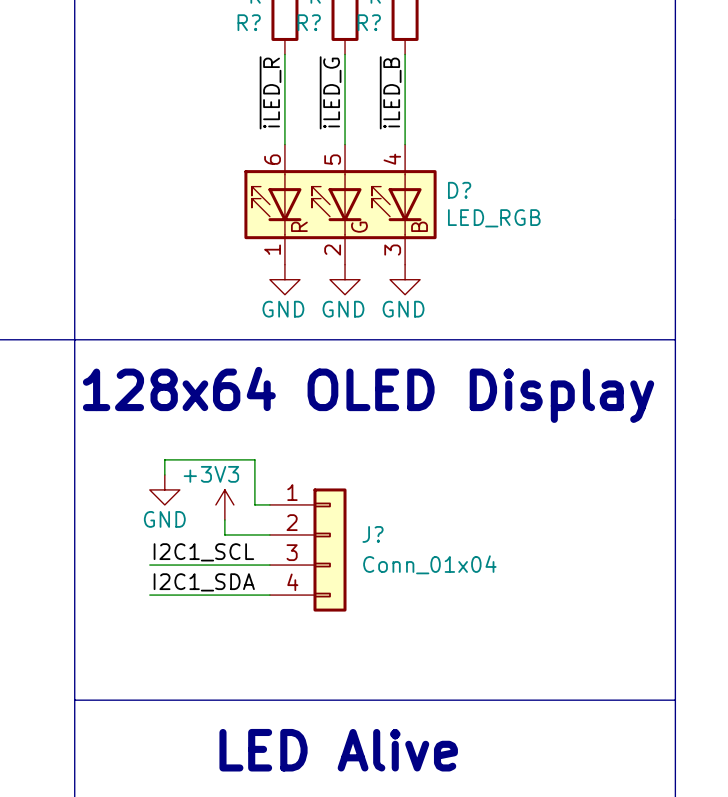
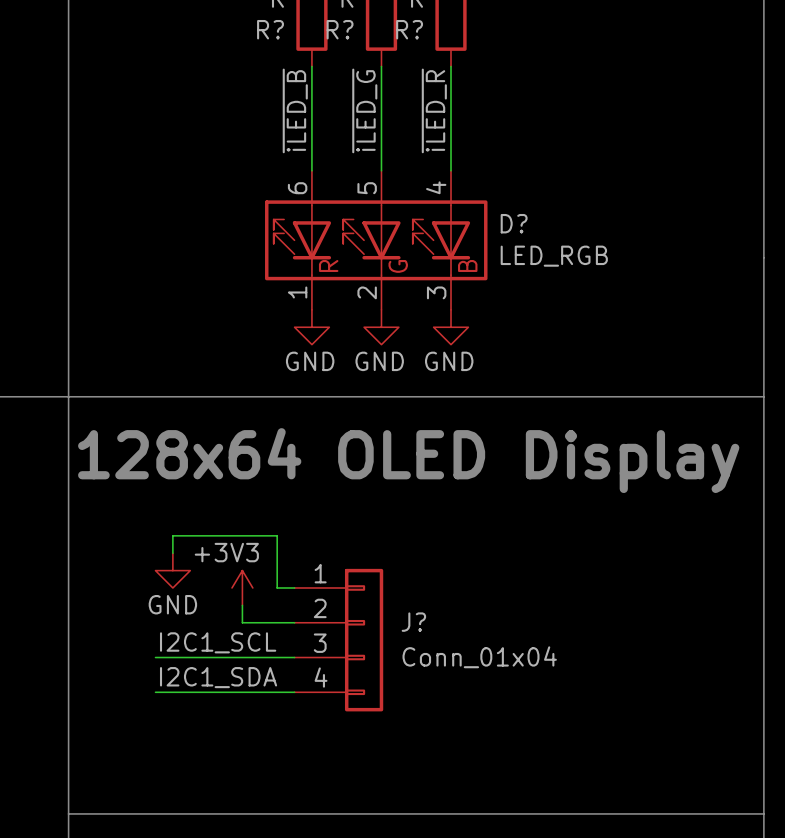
label: ~{iLED_R} (270, 92) -> ~{iLED_B} (295, 110)
label: ~{iLED_B} (390, 92) -> ~{iLED_R} (434, 110)

